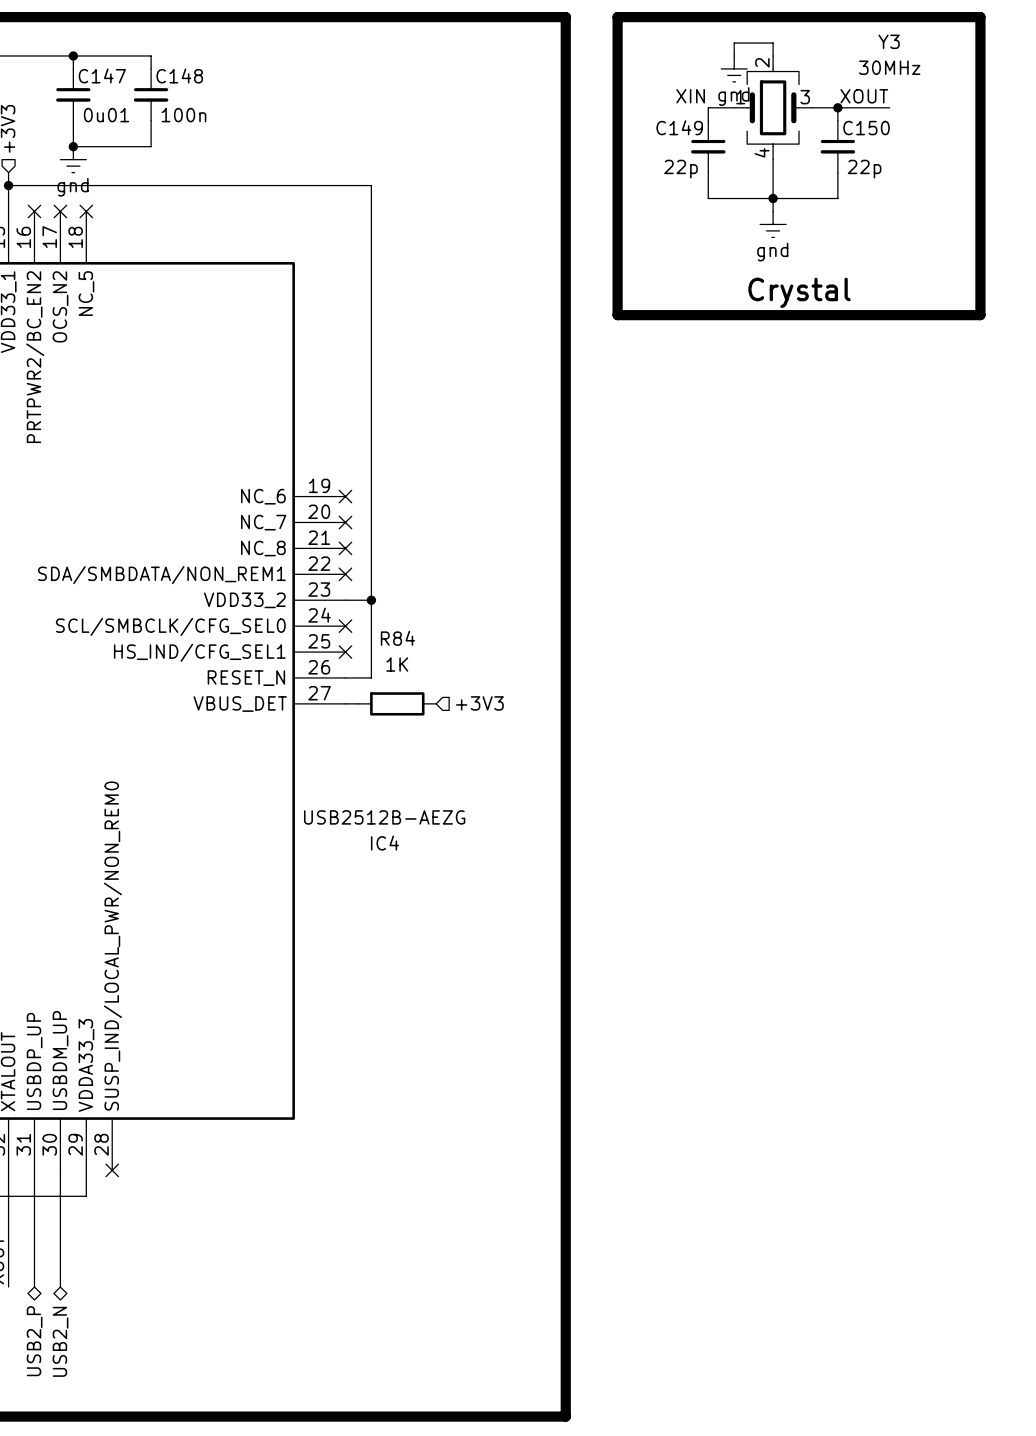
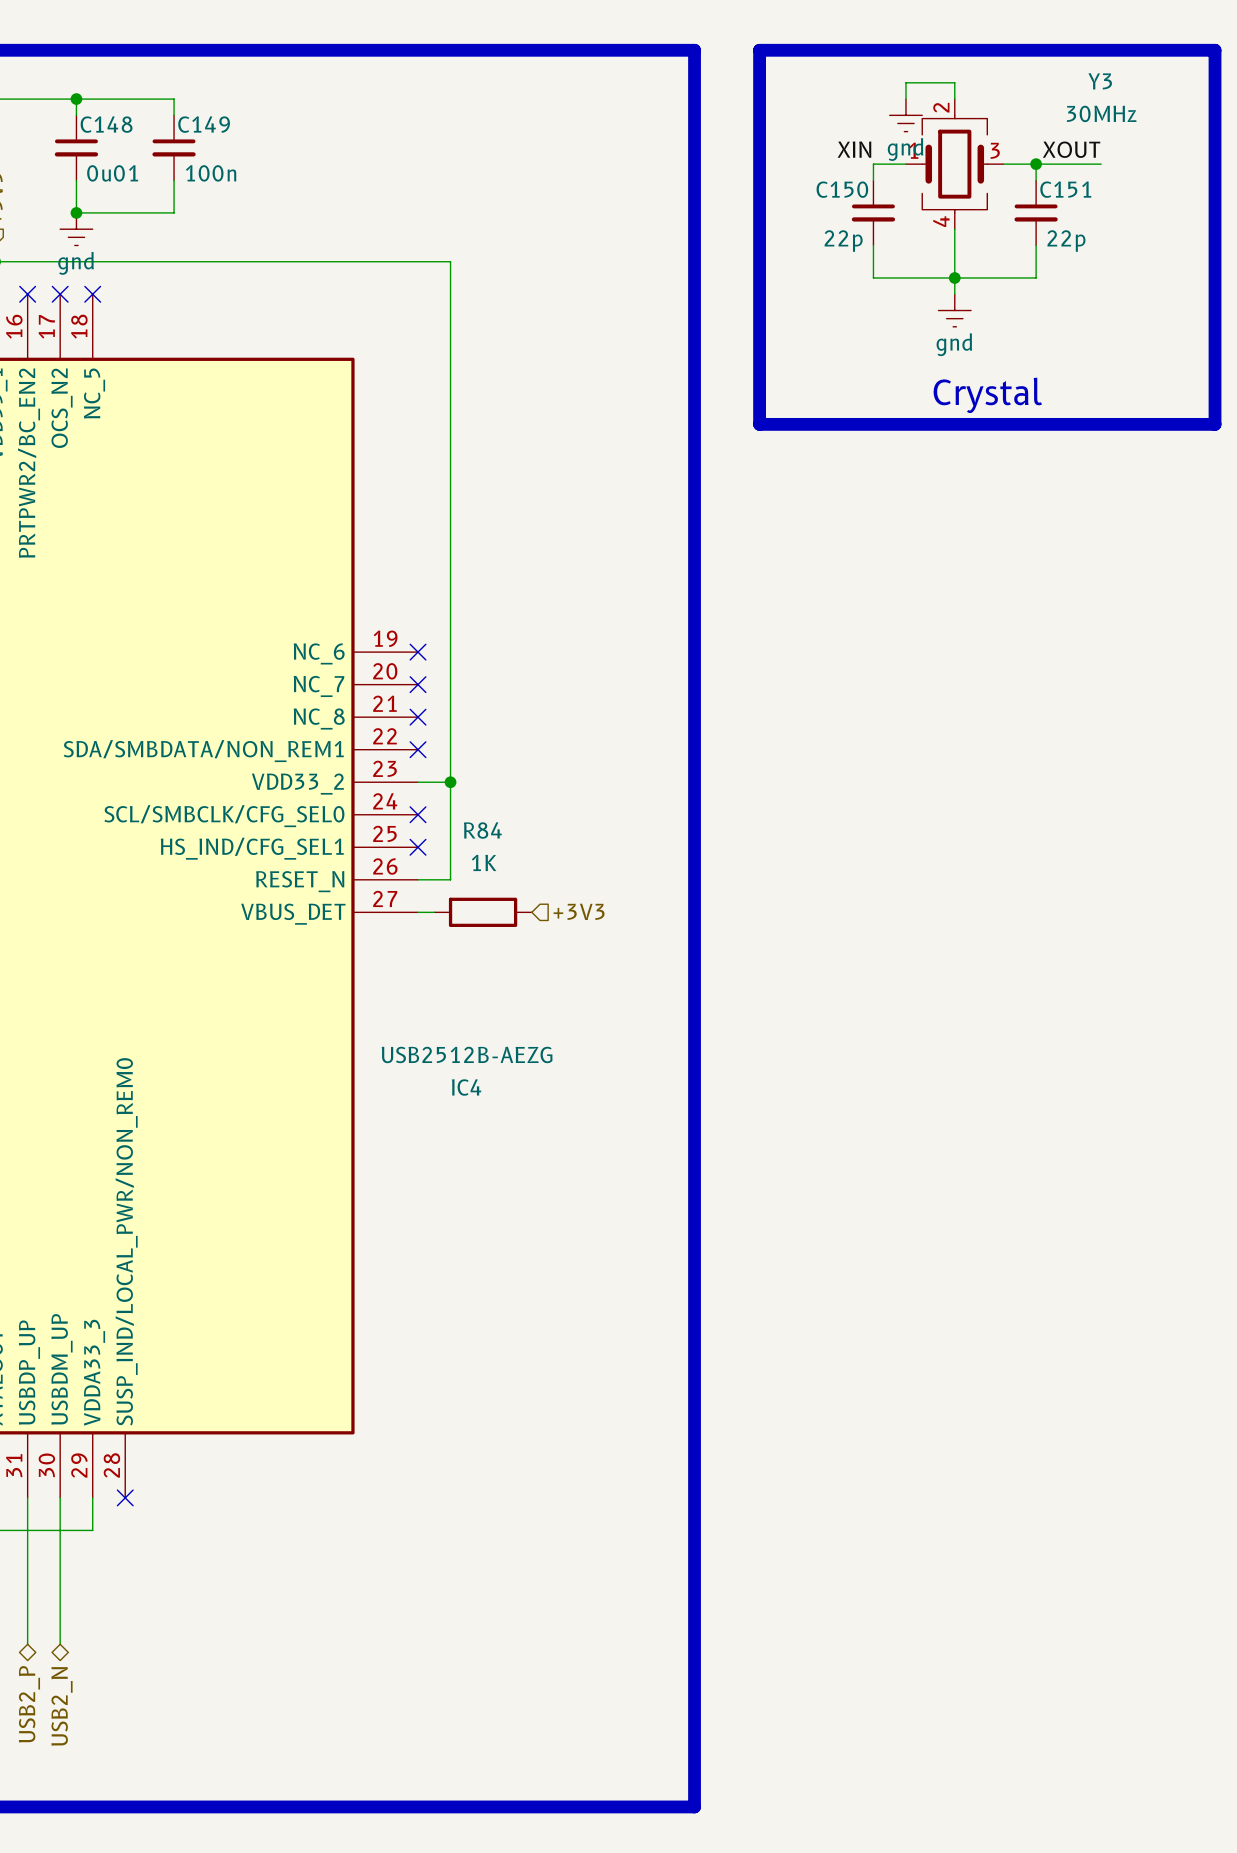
C147 name: C147 (102, 75) -> C148 (106, 124)
C148 name: C148 (179, 75) -> C149 (204, 124)
C149 name: C149 (679, 127) -> C150 (842, 189)
C150 name: C150 (866, 128) -> C151 (1065, 189)

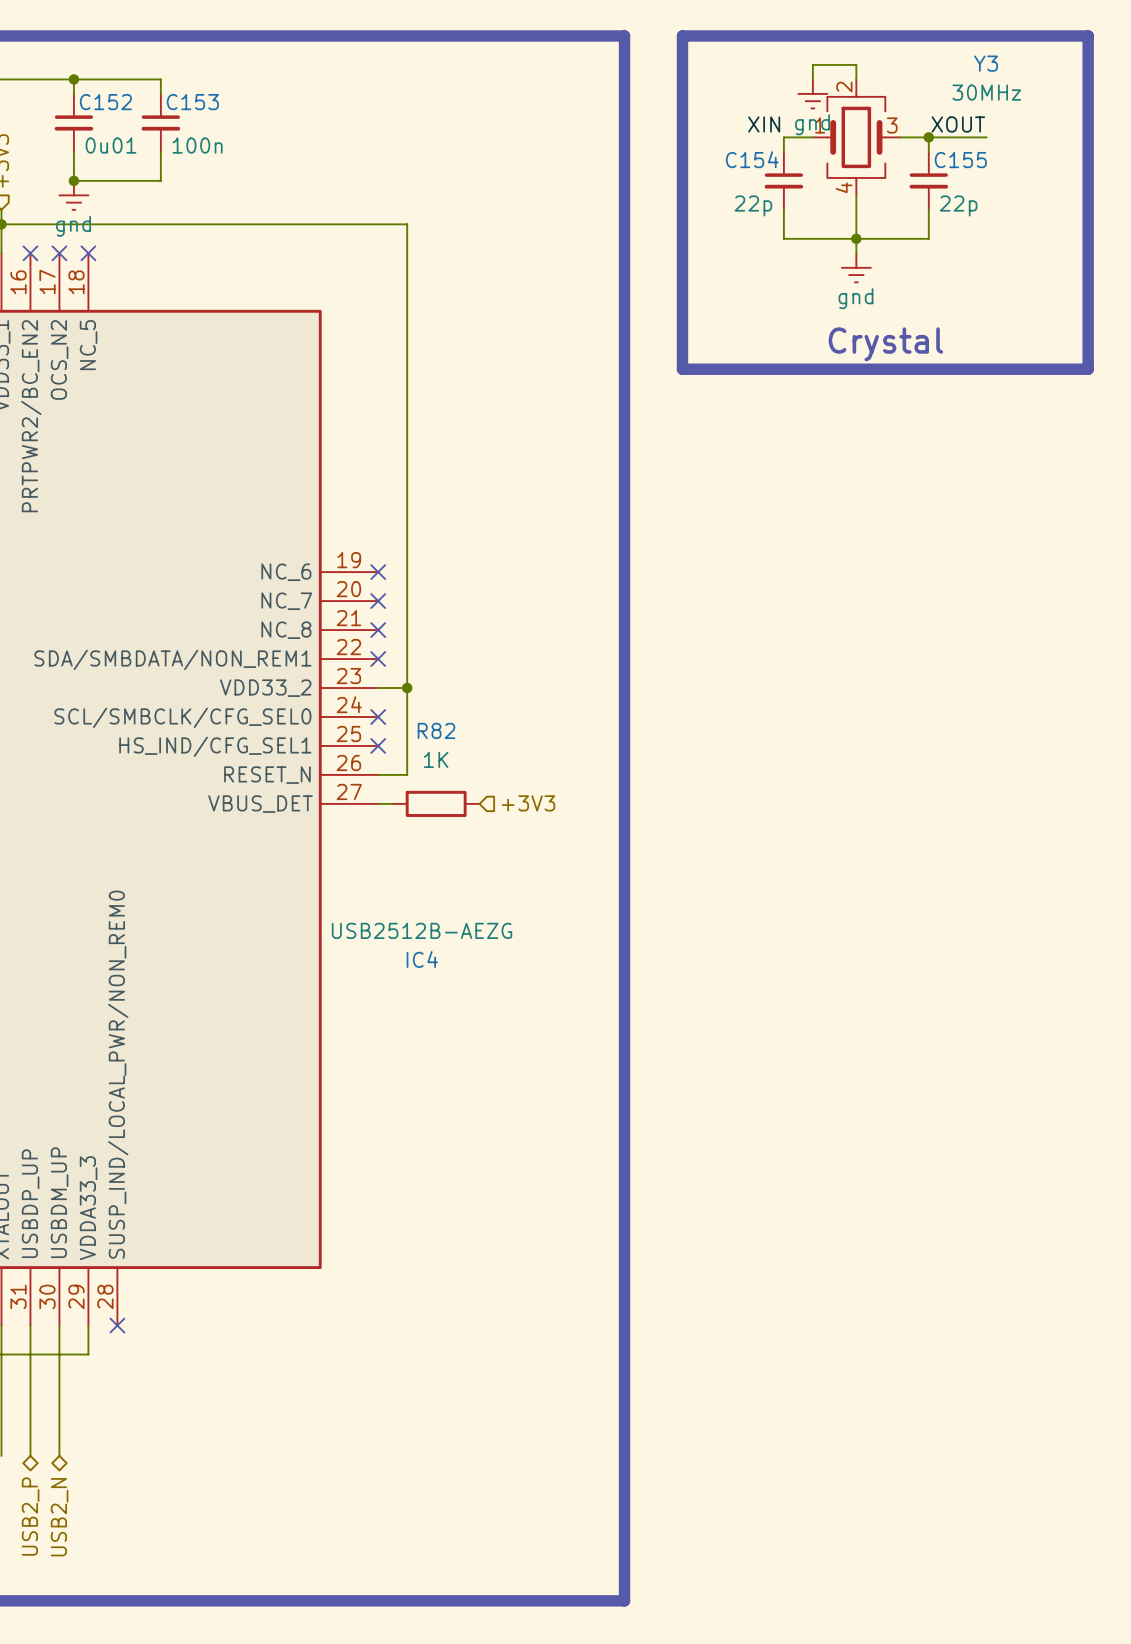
C148 name: C148 (106, 124) -> C152 (105, 102)
C149 name: C149 (204, 124) -> C153 (192, 102)
C150 name: C150 (842, 189) -> C154 (752, 159)
C151 name: C151 (1065, 189) -> C155 (960, 160)
R84 name: R84 (482, 830) -> R82 (436, 730)

